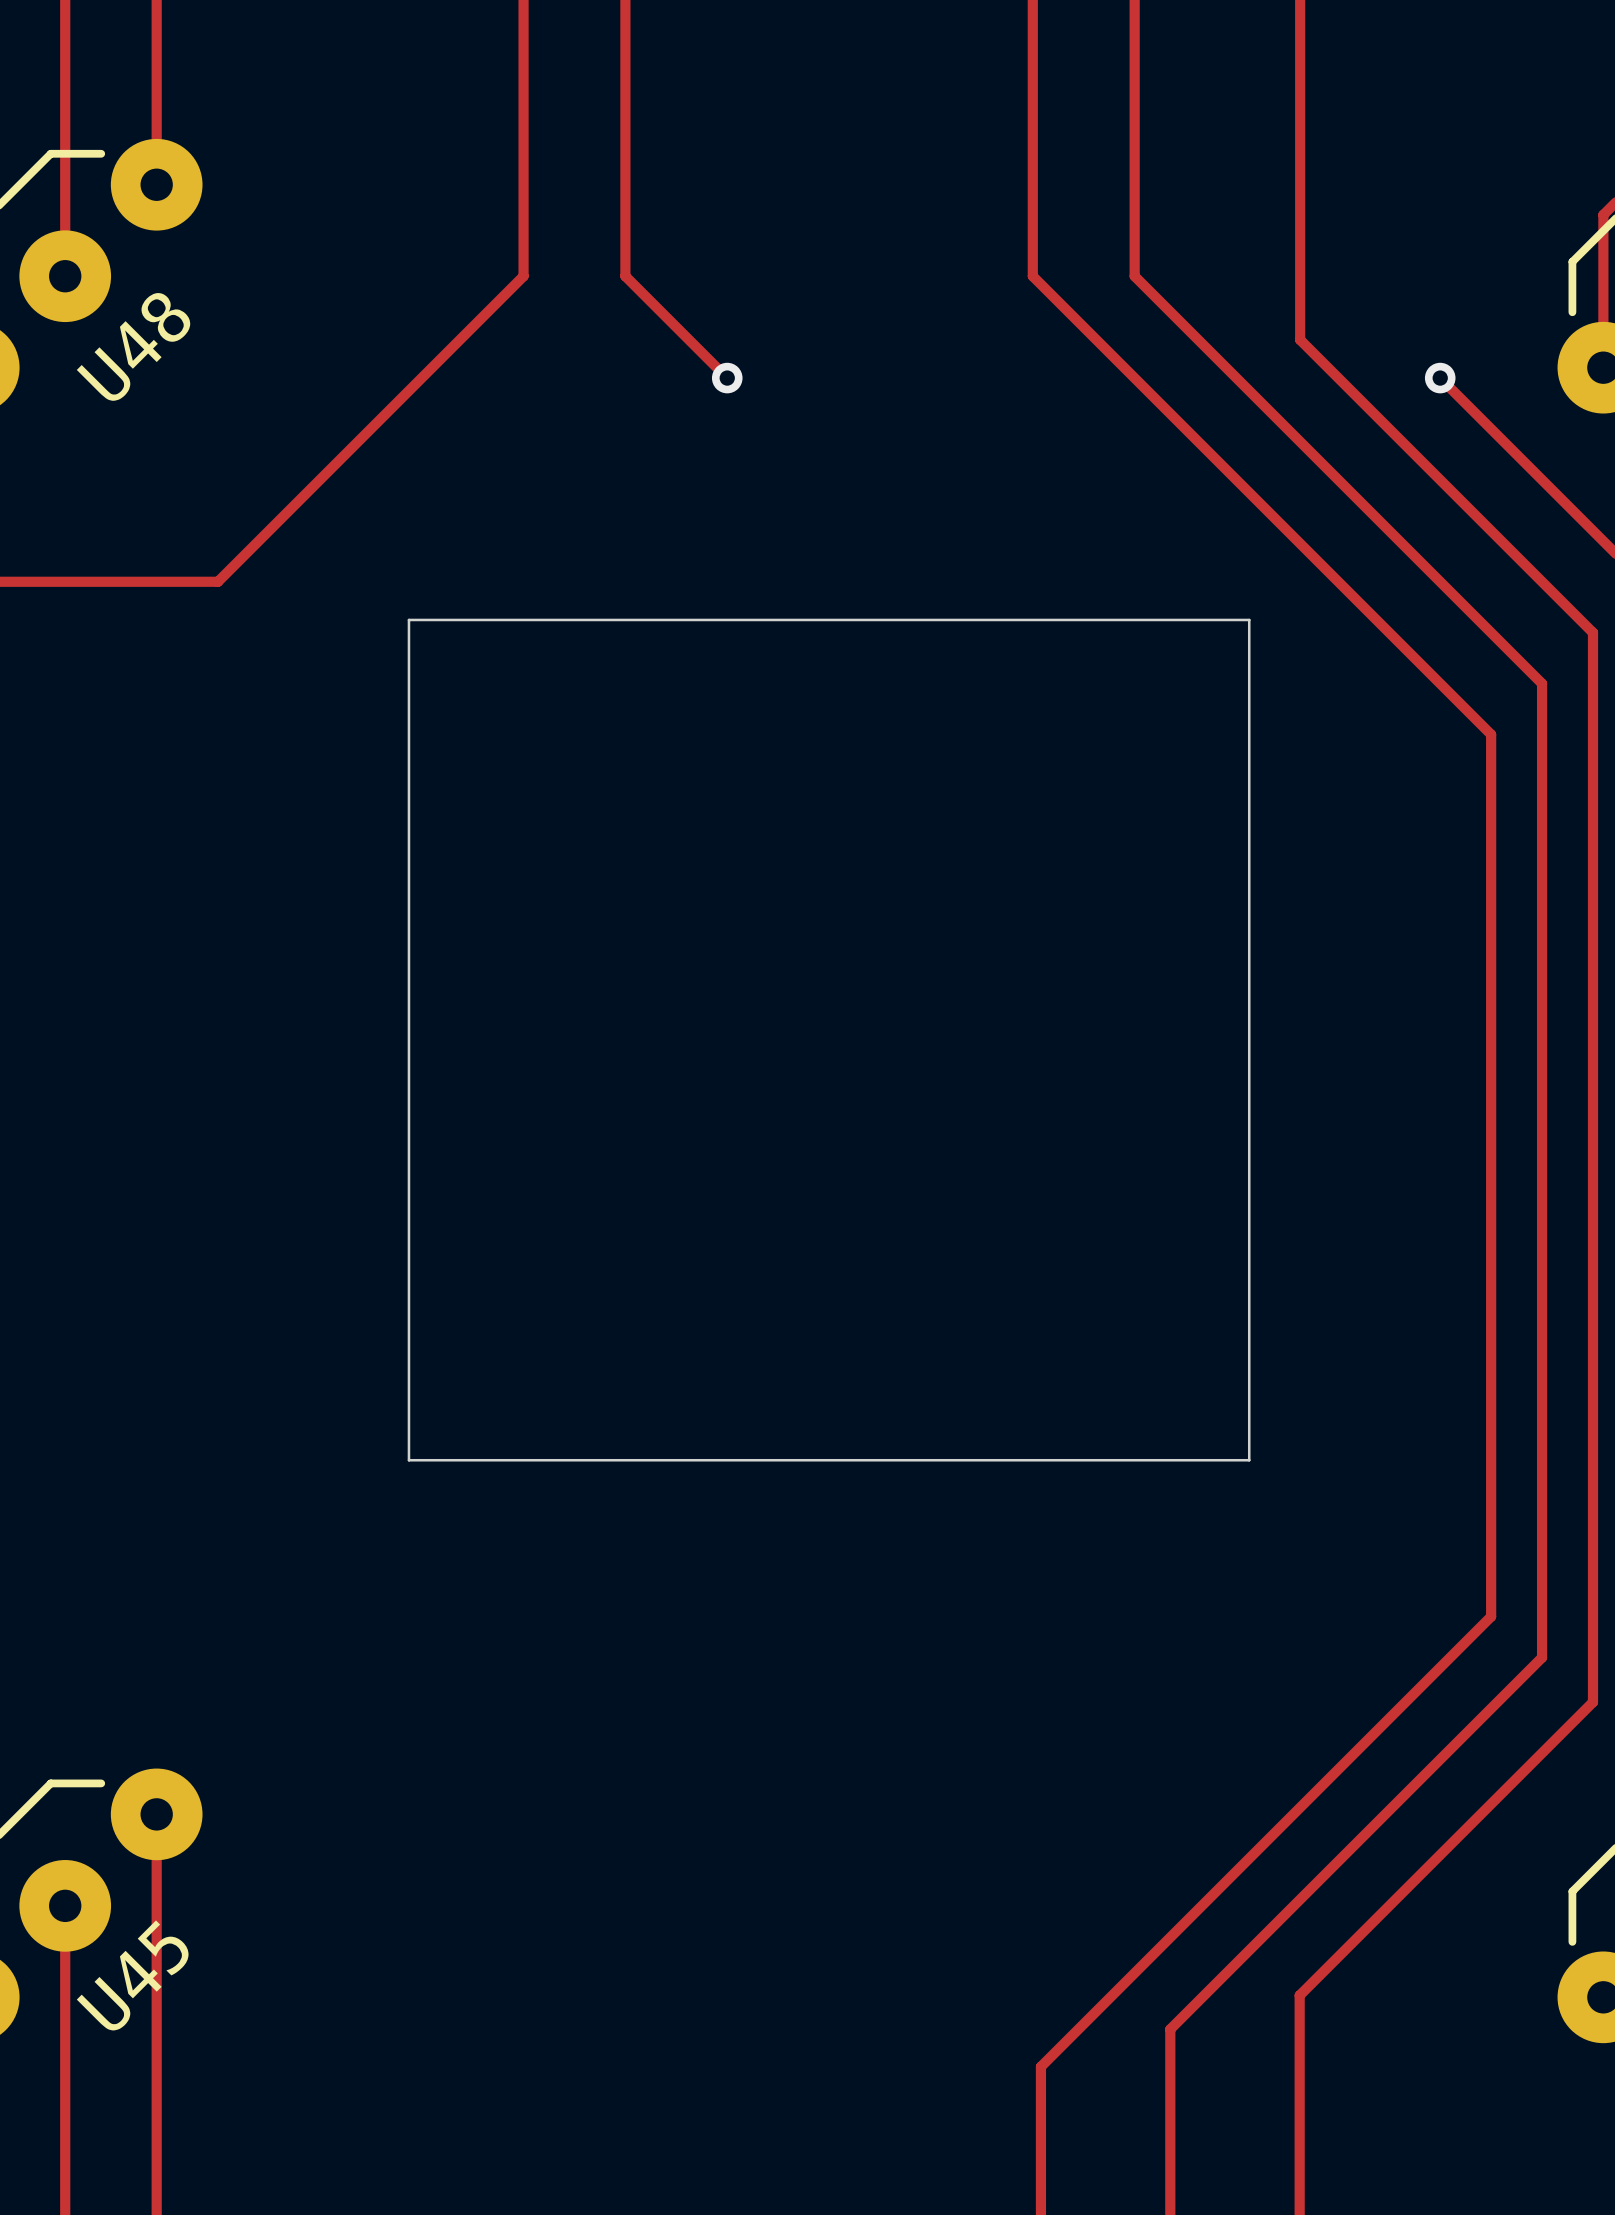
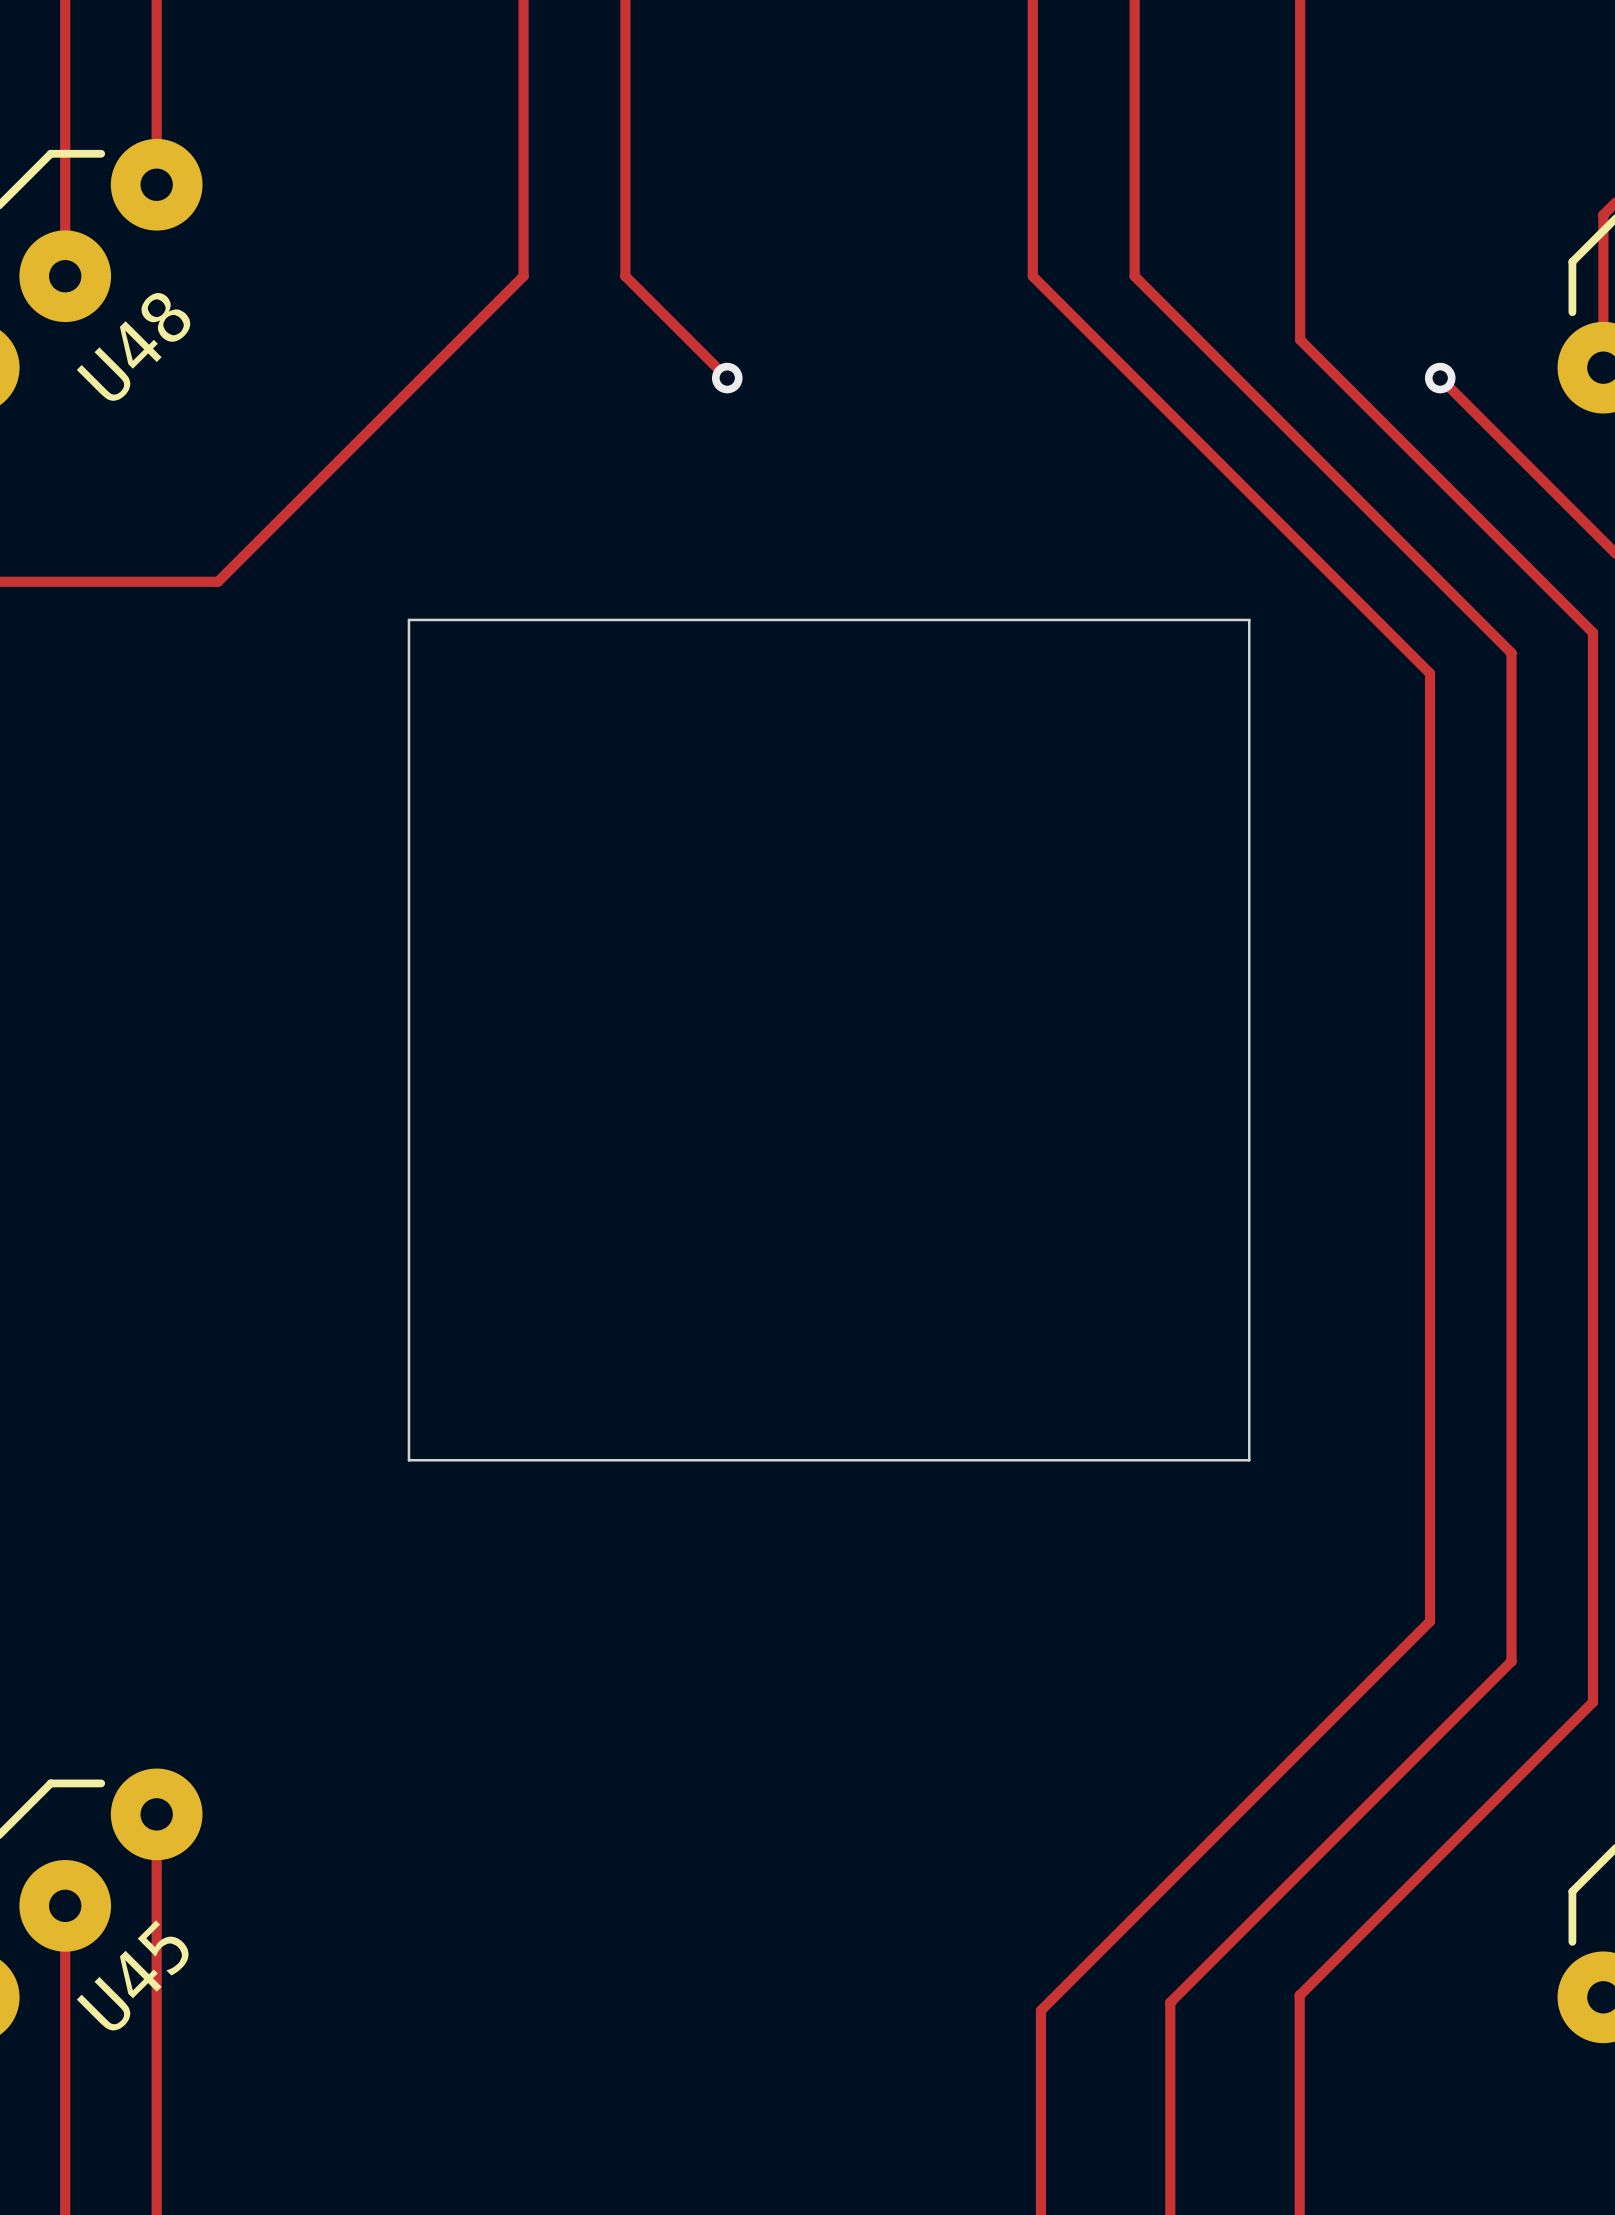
track: (1511, 653) (1542, 683) (1542, 1657) (1170, 2029) -> (1511, 653) (1511, 1661) (1170, 2002) (1170, 2029)
track: (1430, 673) (1491, 734) (1491, 1616) (1040, 2066) -> (1430, 673) (1430, 1621) (1040, 2010) (1040, 2066)

